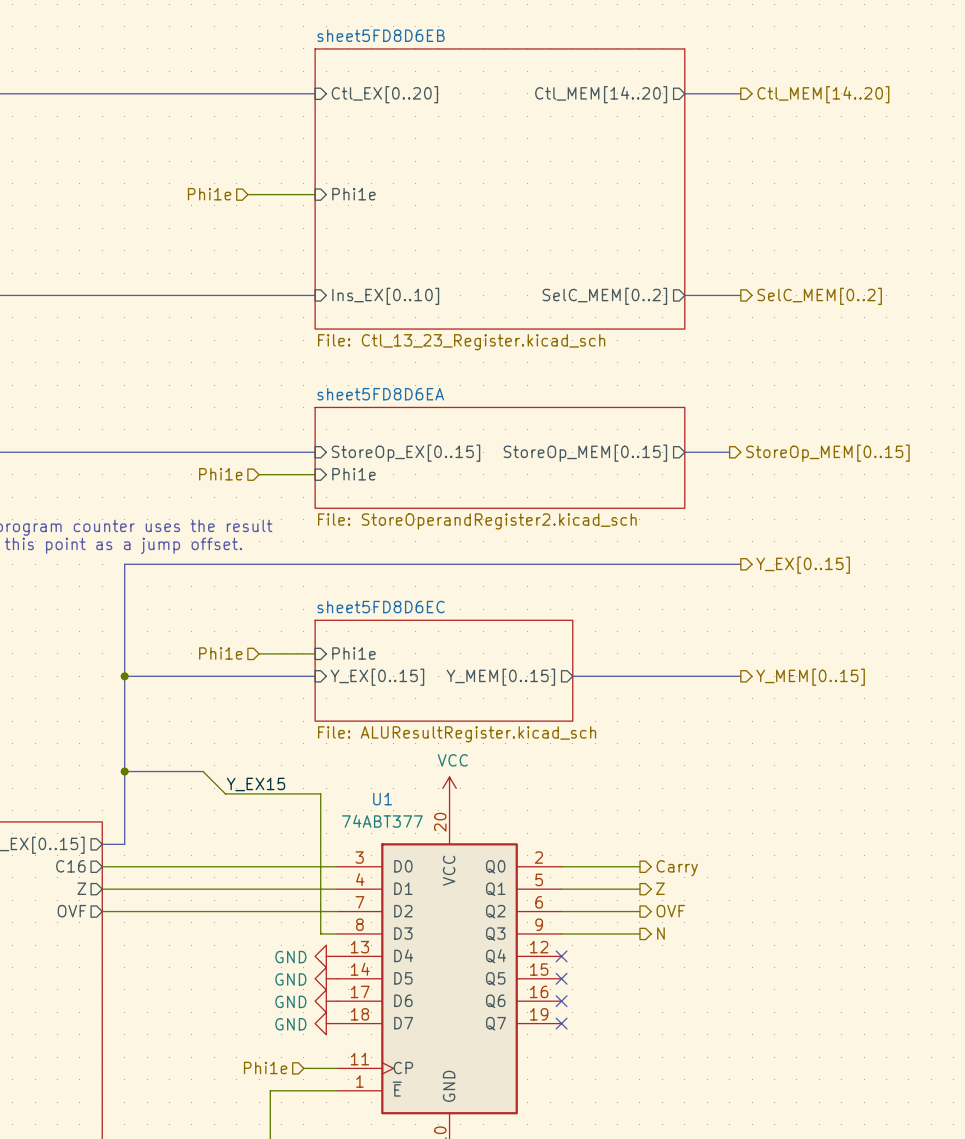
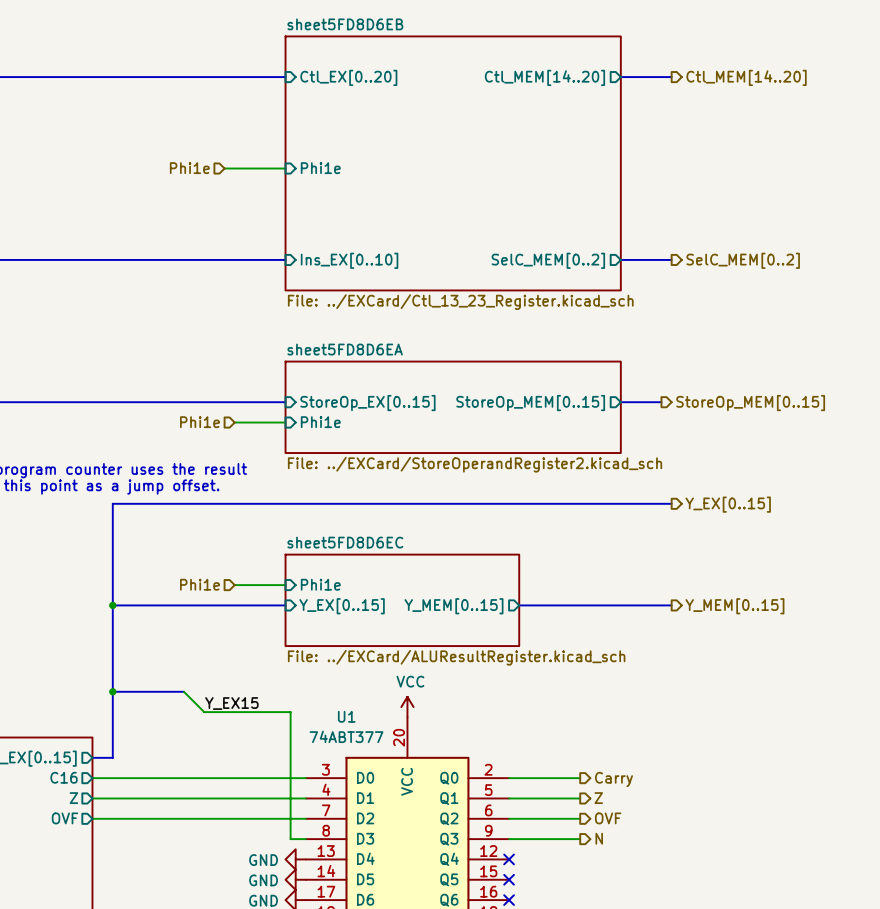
sheet sheet5FD8D6EB value: File: Ctl_13_23_Register.kicad_sch (461, 342) -> File: ../EXCard/Ctl_13_23_Register.kicad_sch (460, 302)
sheet sheet5FD8D6EA value: File: StoreOperandRegister2.kicad_sch (477, 521) -> File: ../EXCard/StoreOperandRegister2.kicad_sch (475, 464)
sheet sheet5FD8D6EC value: File: ALUResultRegister.kicad_sch (457, 734) -> File: ../EXCard/ALUResultRegister.kicad_sch (456, 657)

